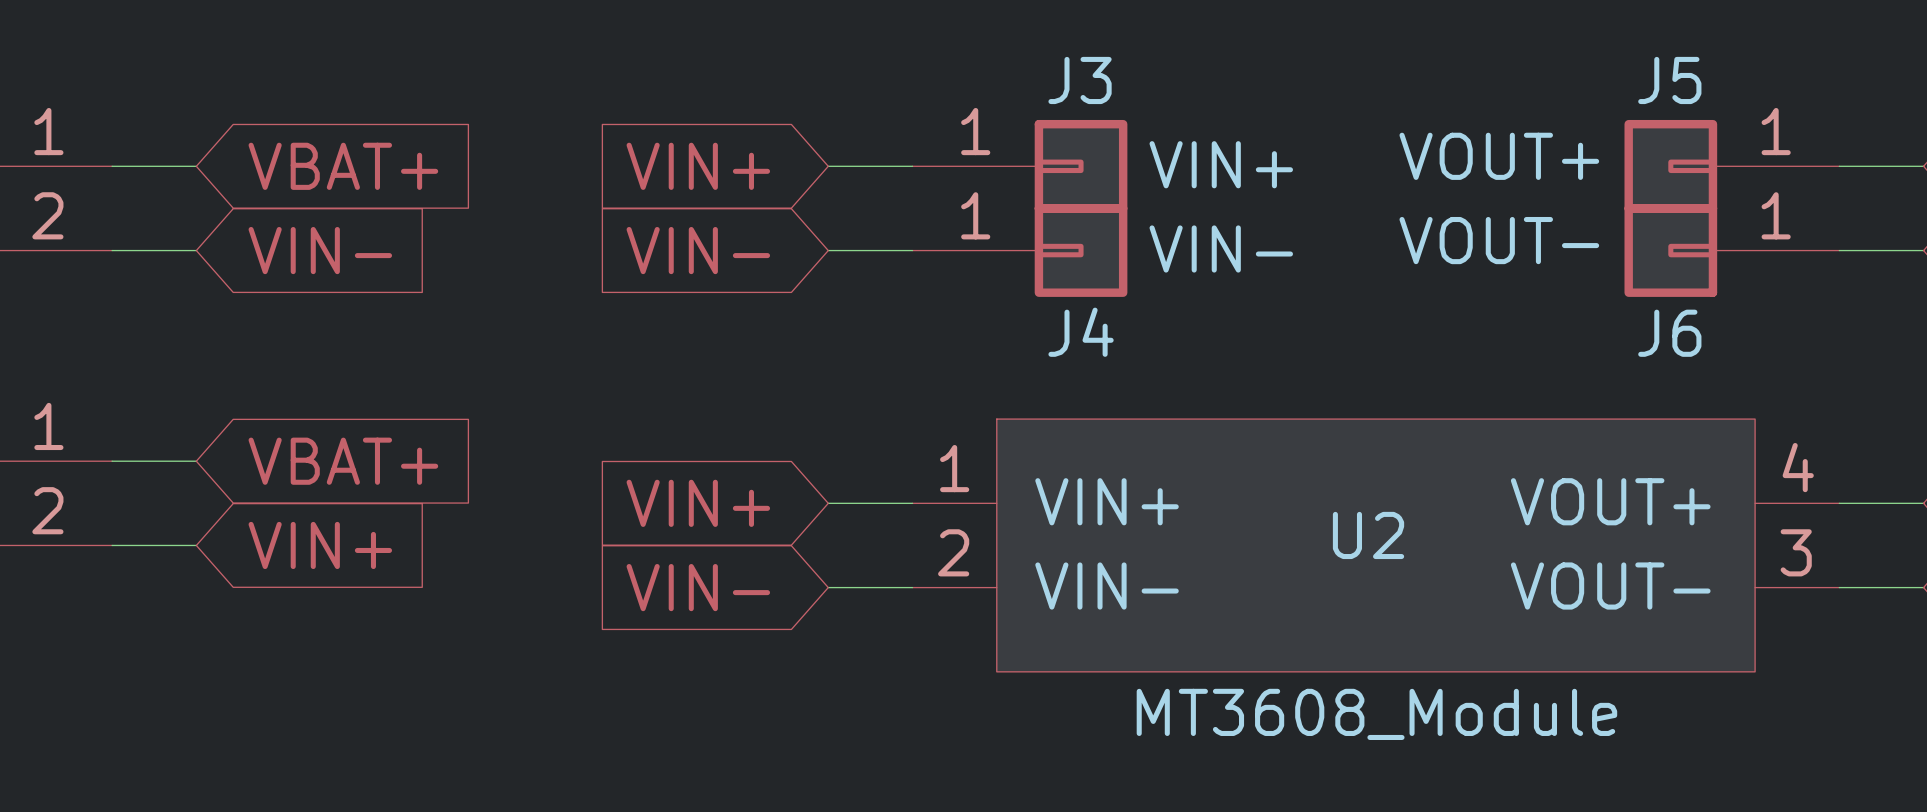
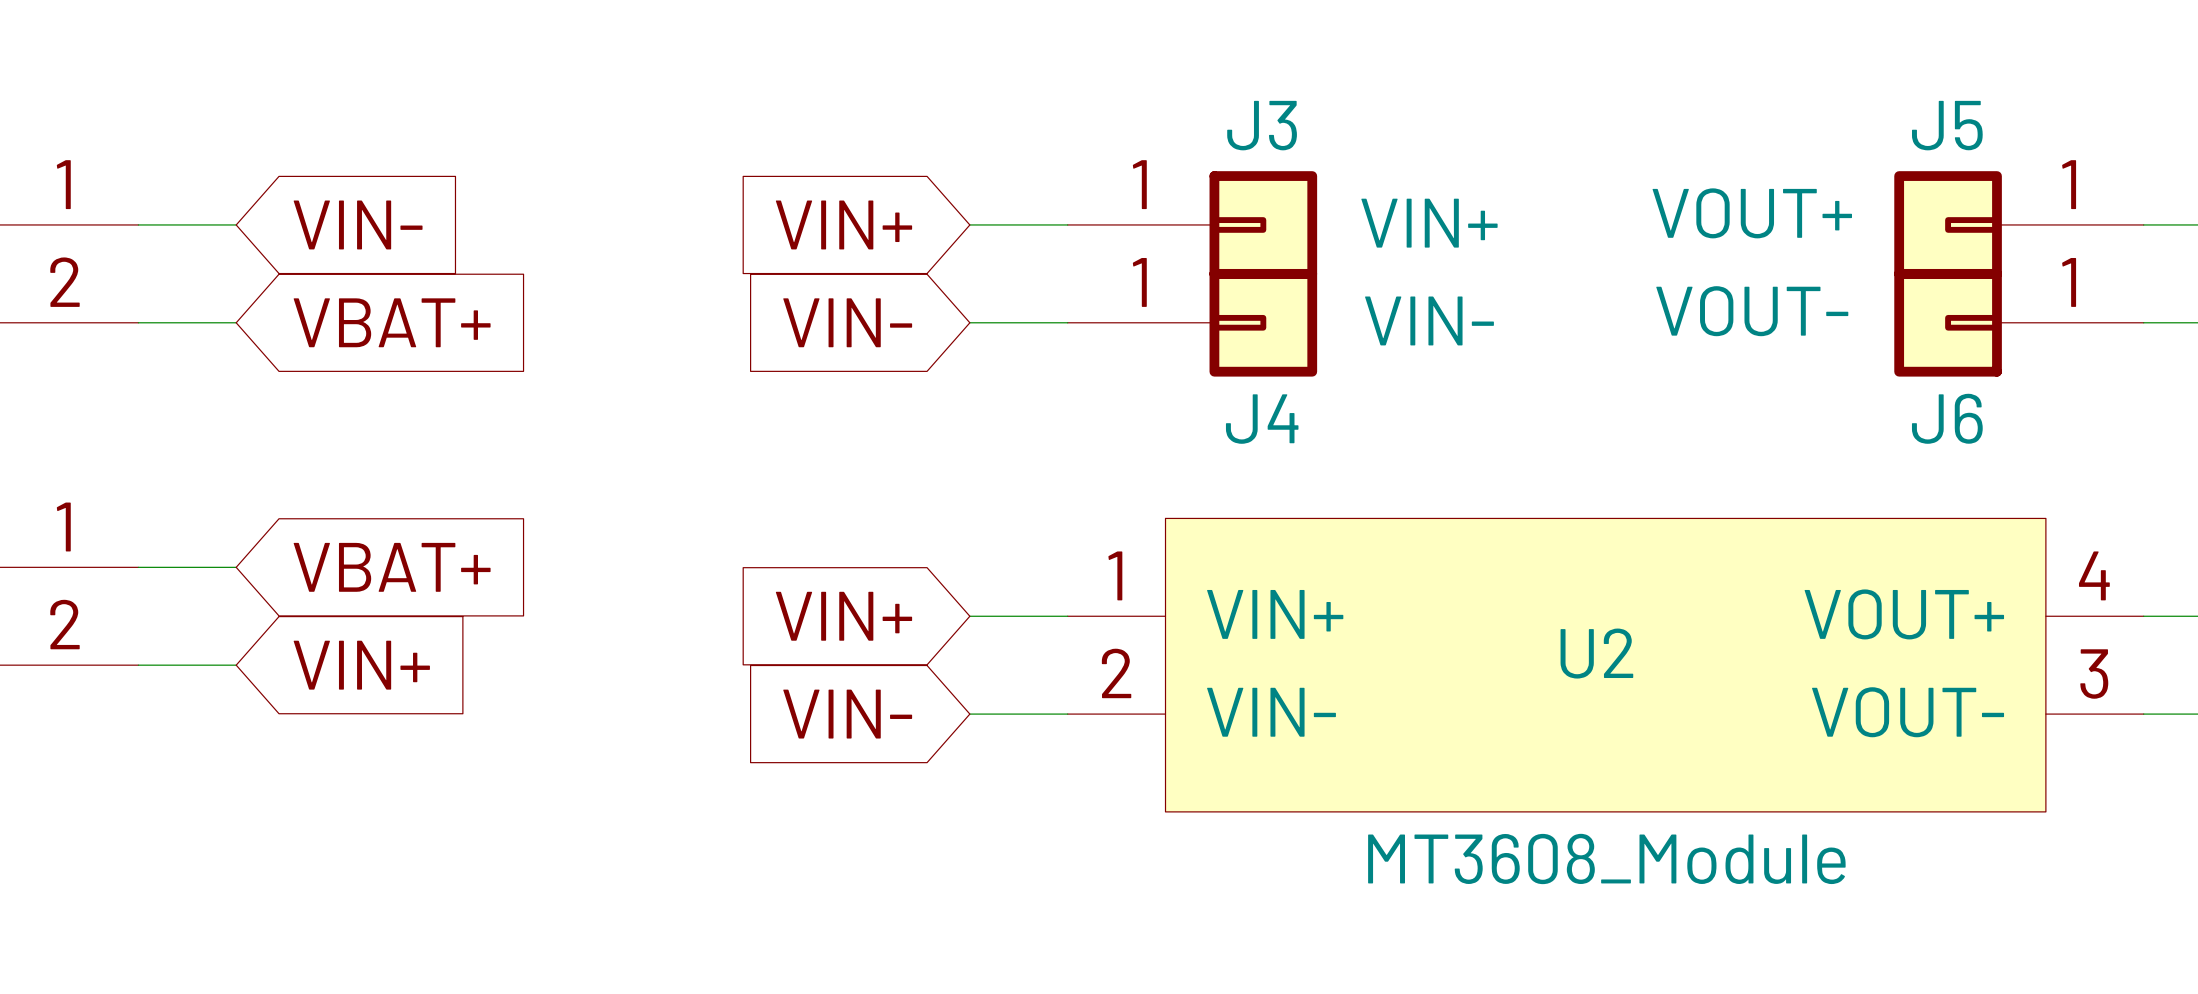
global label: VBAT+ (343, 166) -> VIN- (358, 224)
global label: VIN- (320, 250) -> VBAT+ (392, 322)

